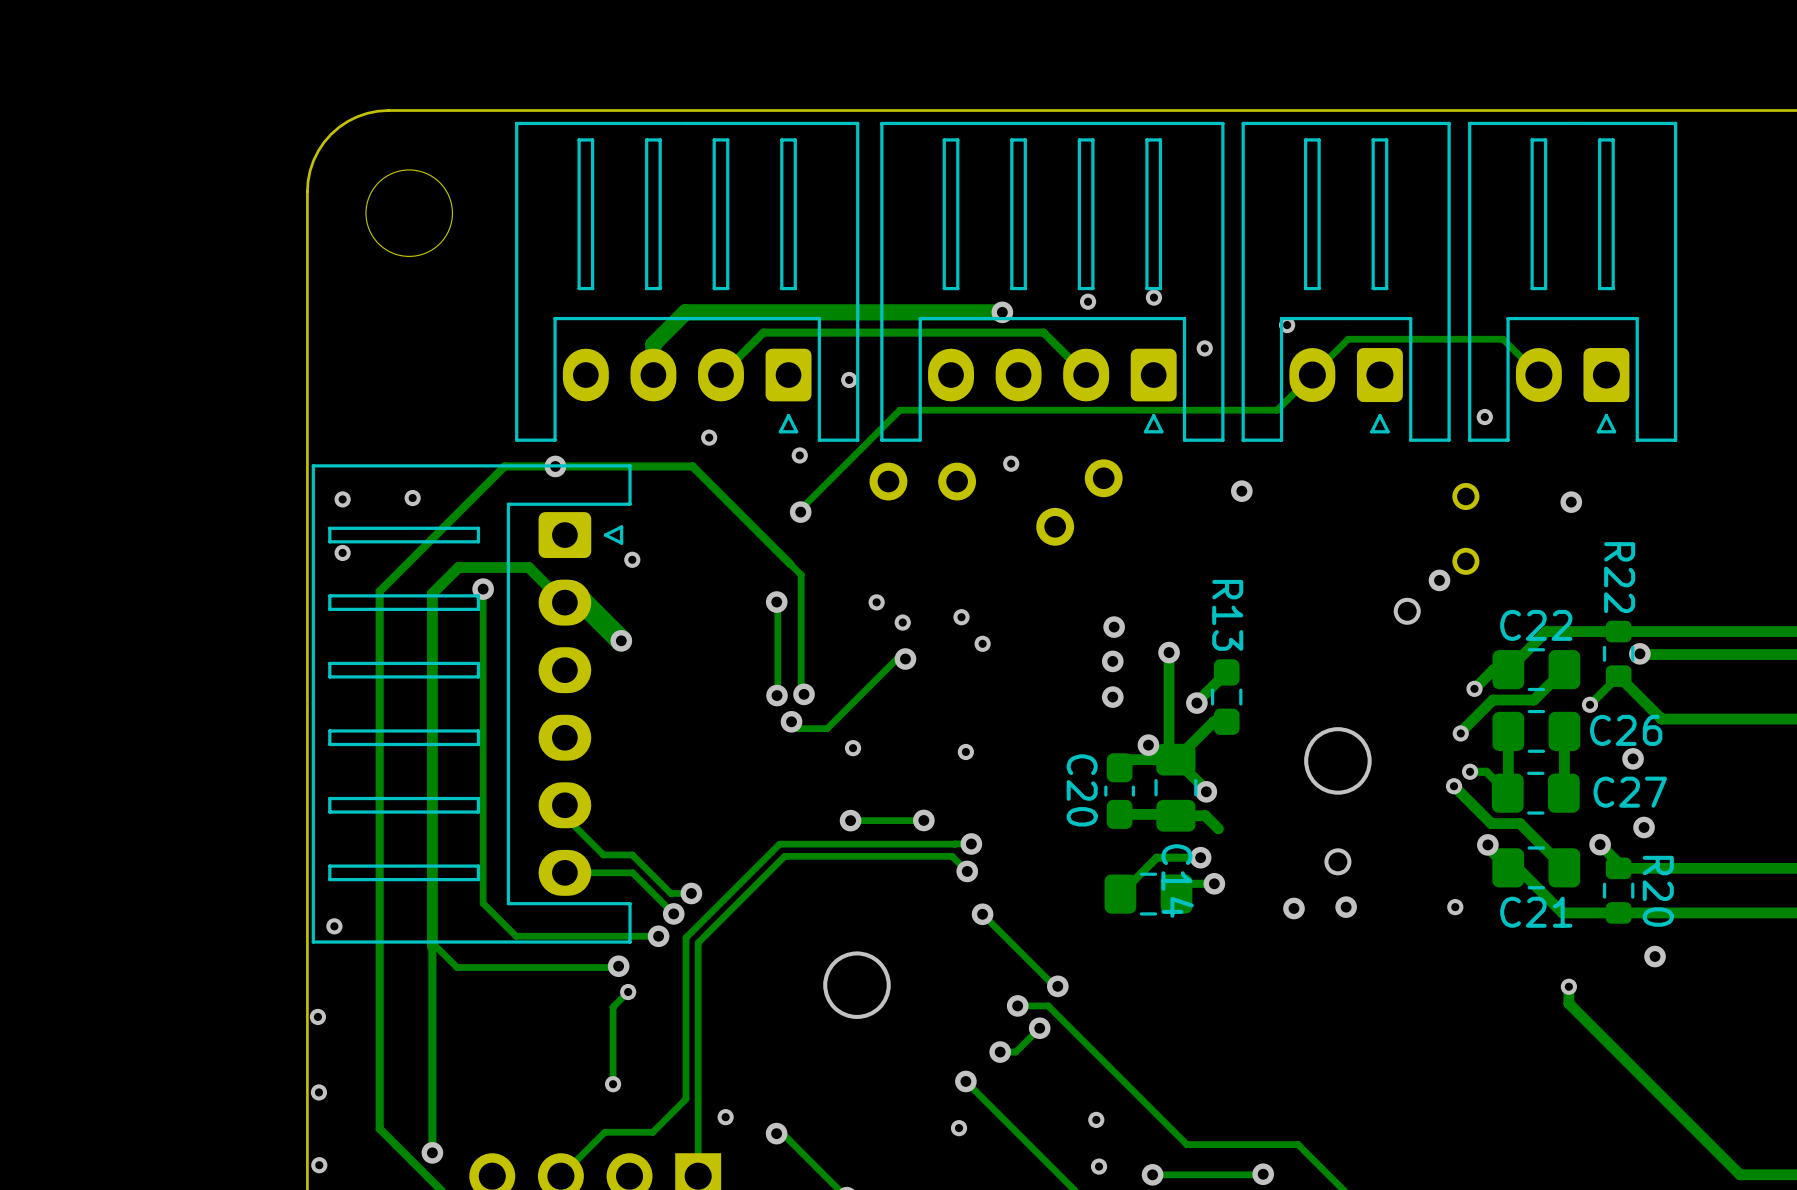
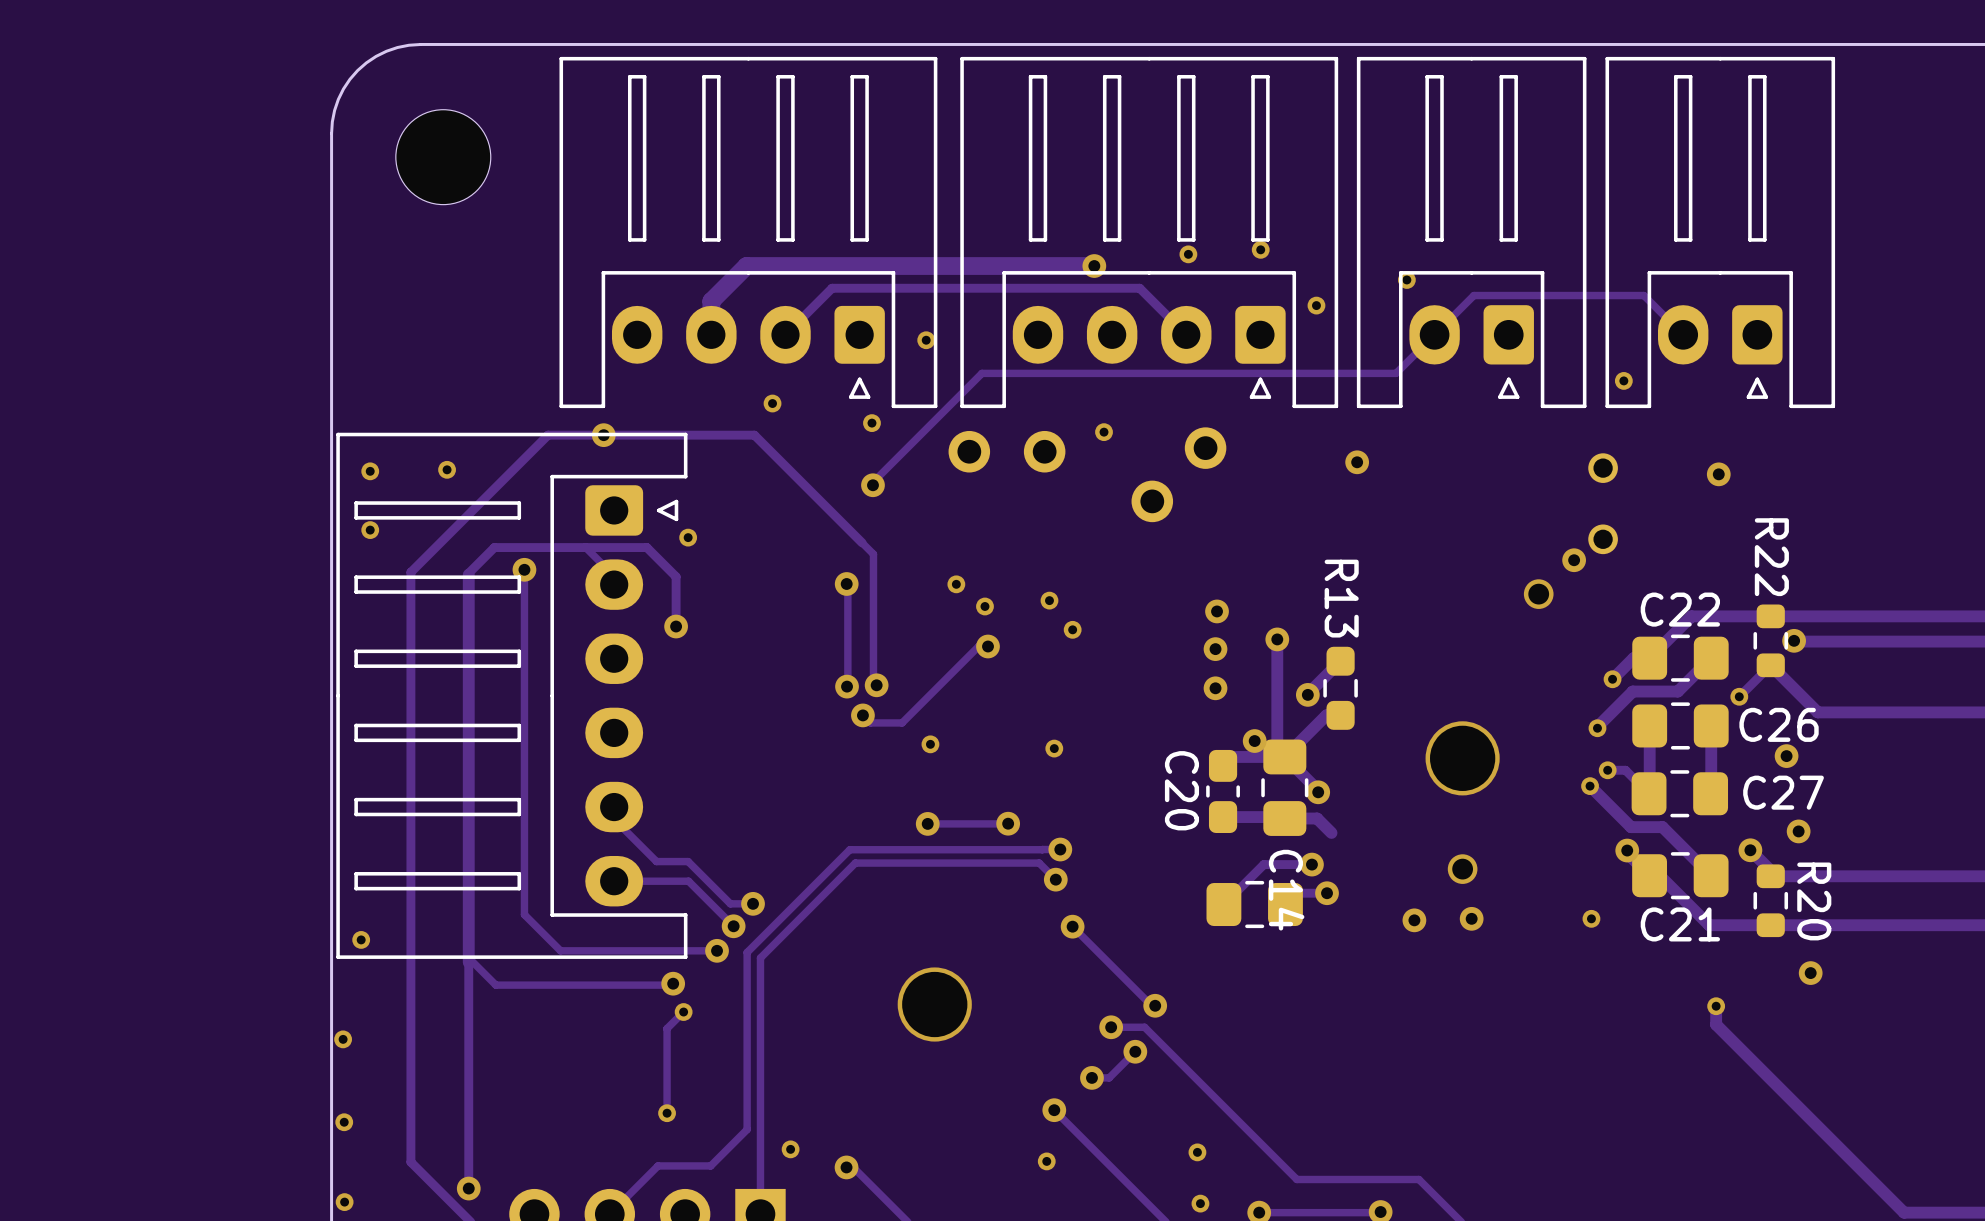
track: none -> (585, 547) (614, 576)
track: (432, 593) (458, 567) (528, 567) (563, 602) (583, 602) (621, 640) -> (468, 574) (494, 547) (646, 547) (676, 576) (676, 626)

